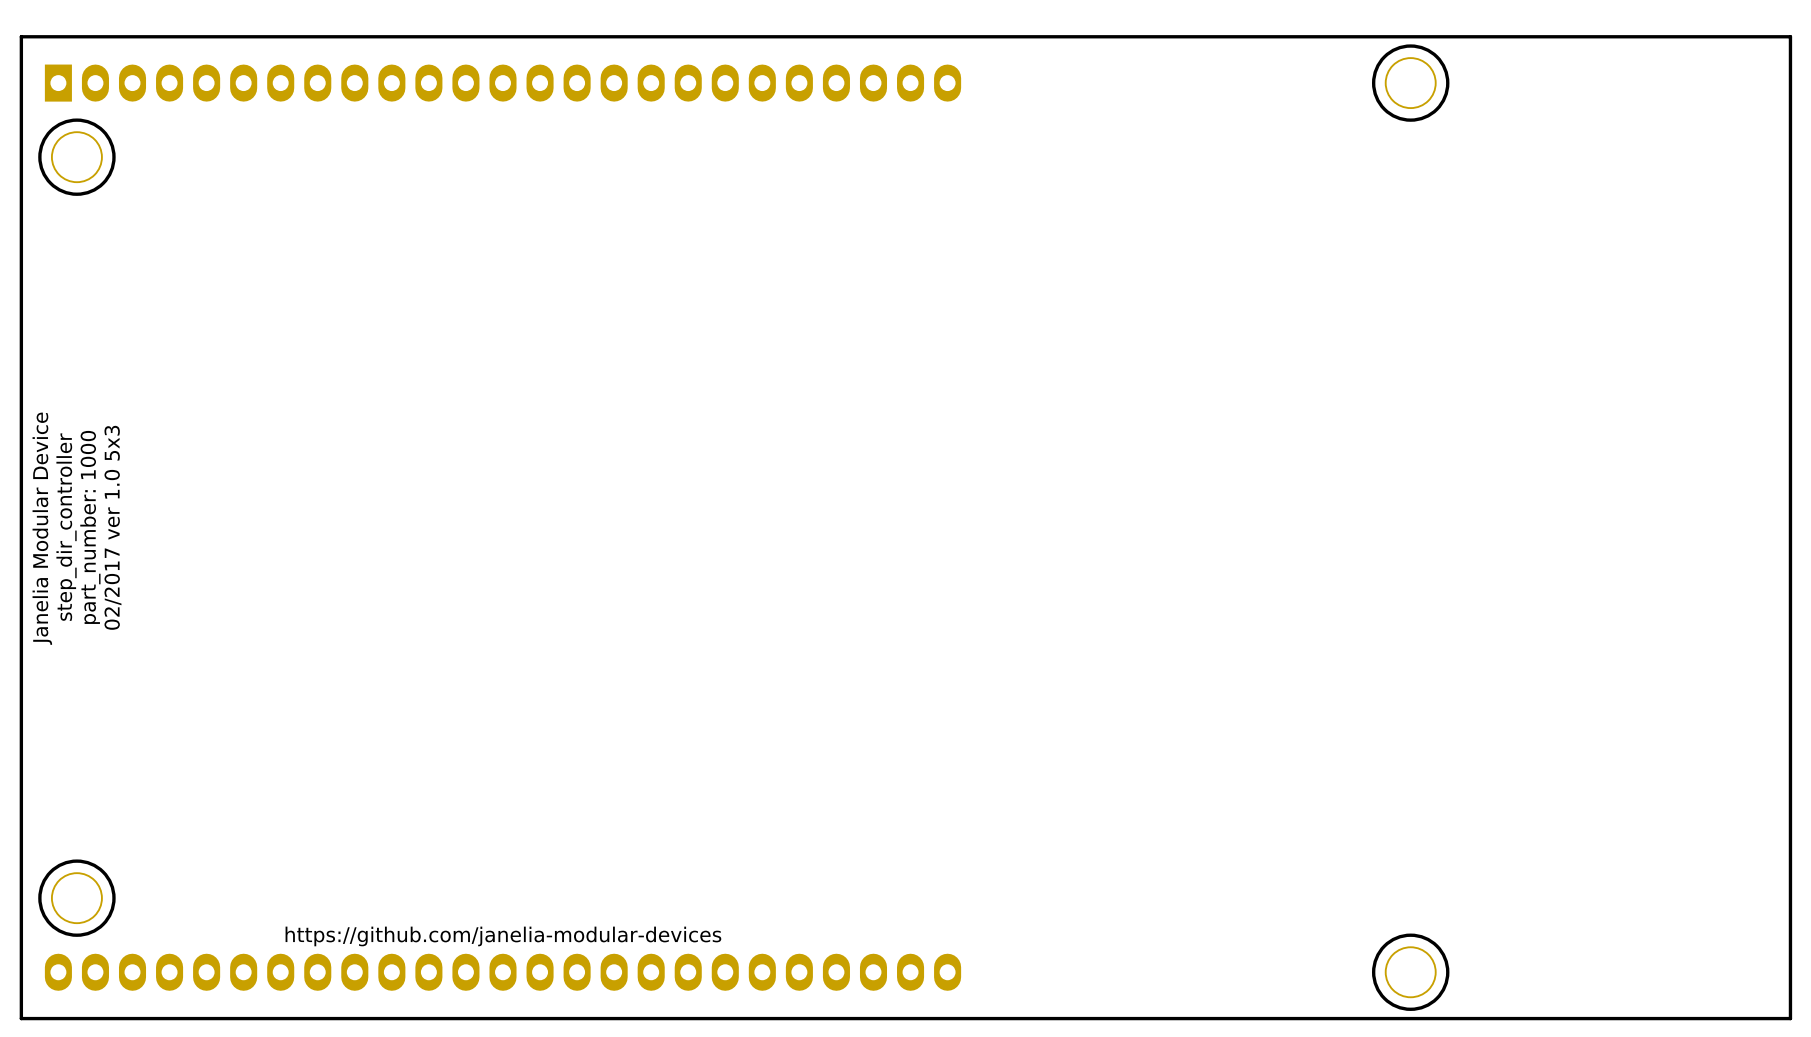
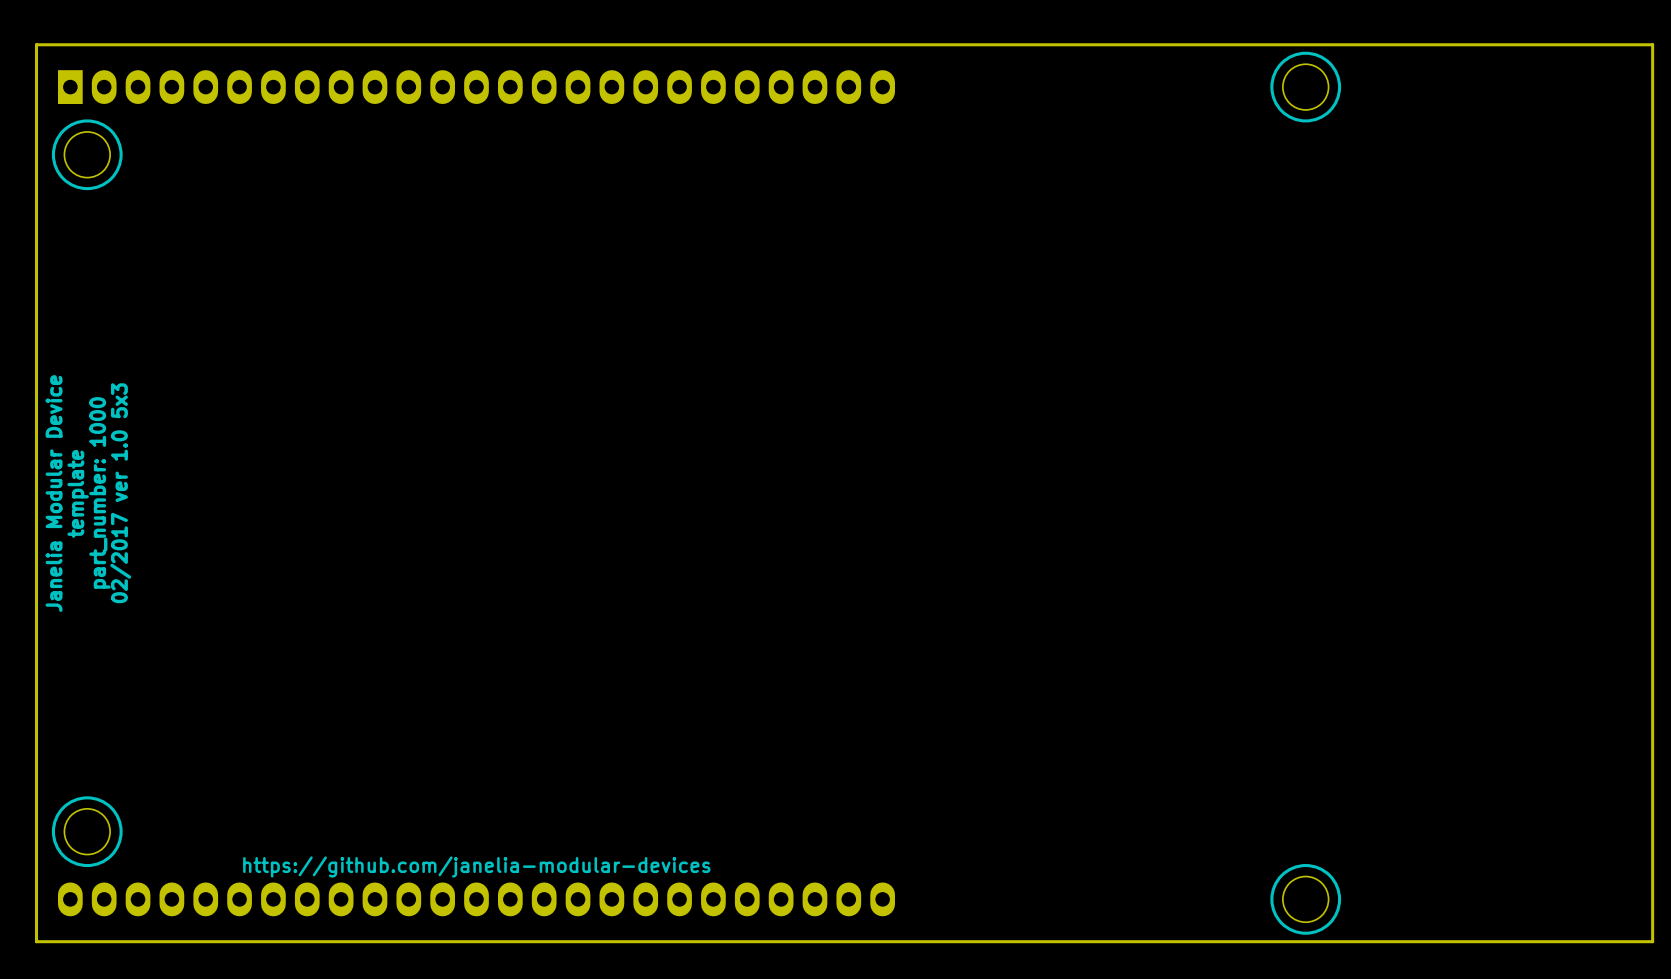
text: step_dir_controller (66, 527) -> template (78, 493)

